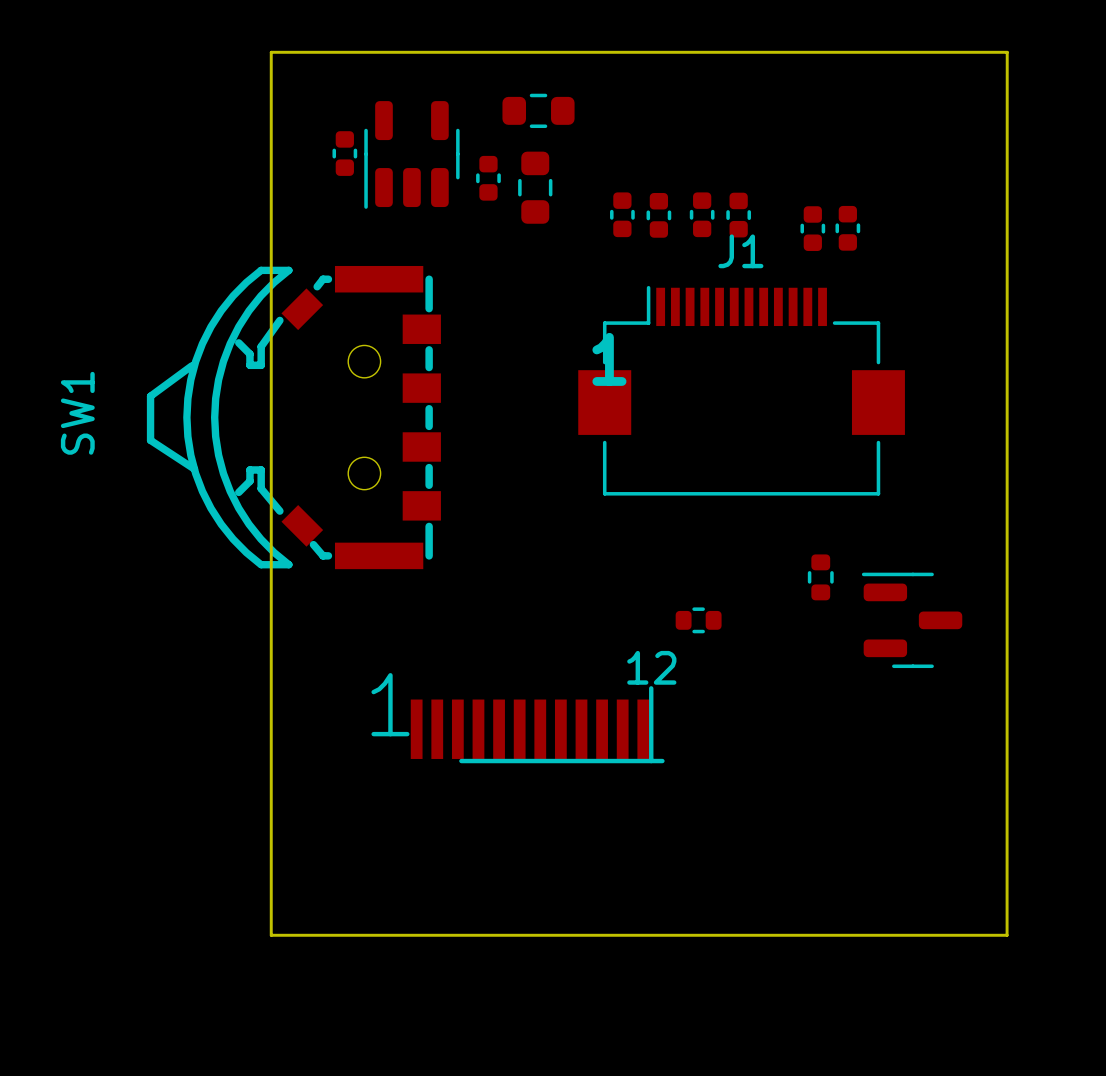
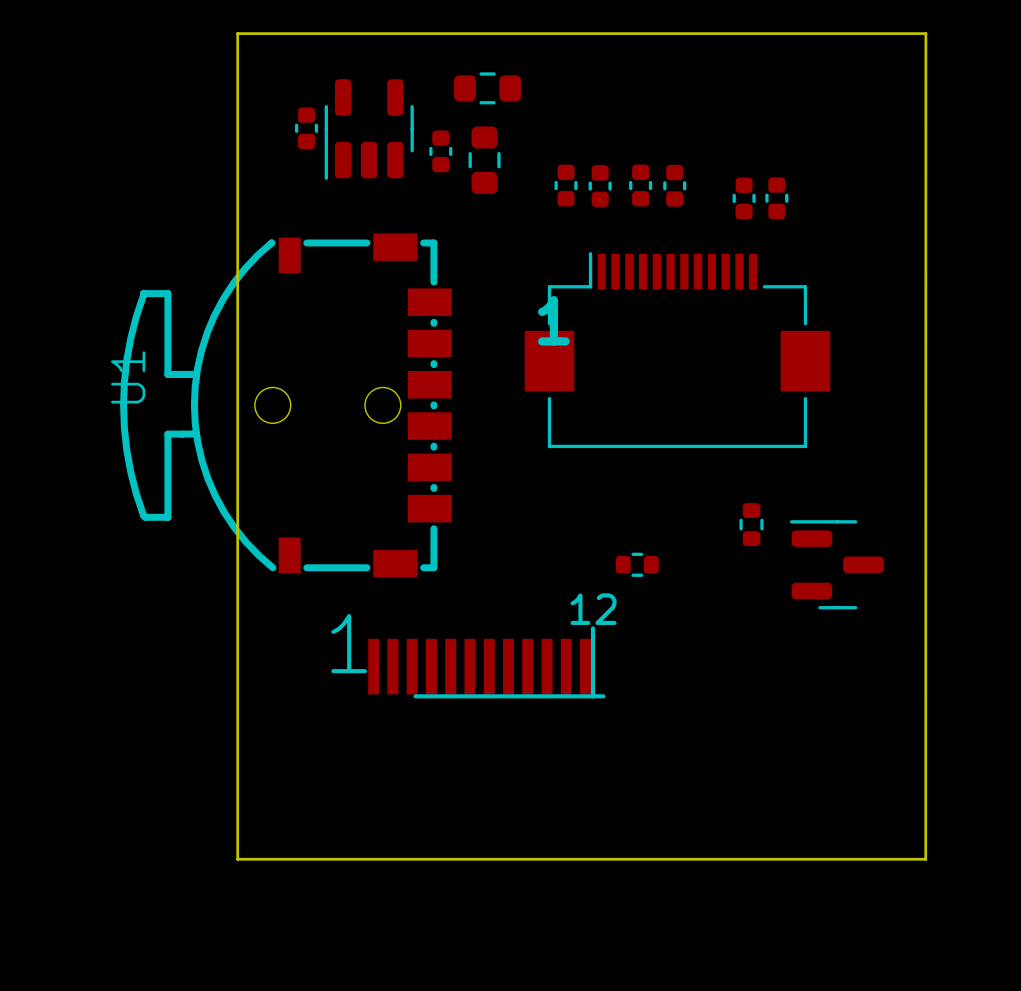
J1 name: J1 (740, 251) -> none
SW1: (293, 417) -> none
part: none -> (285, 405)

